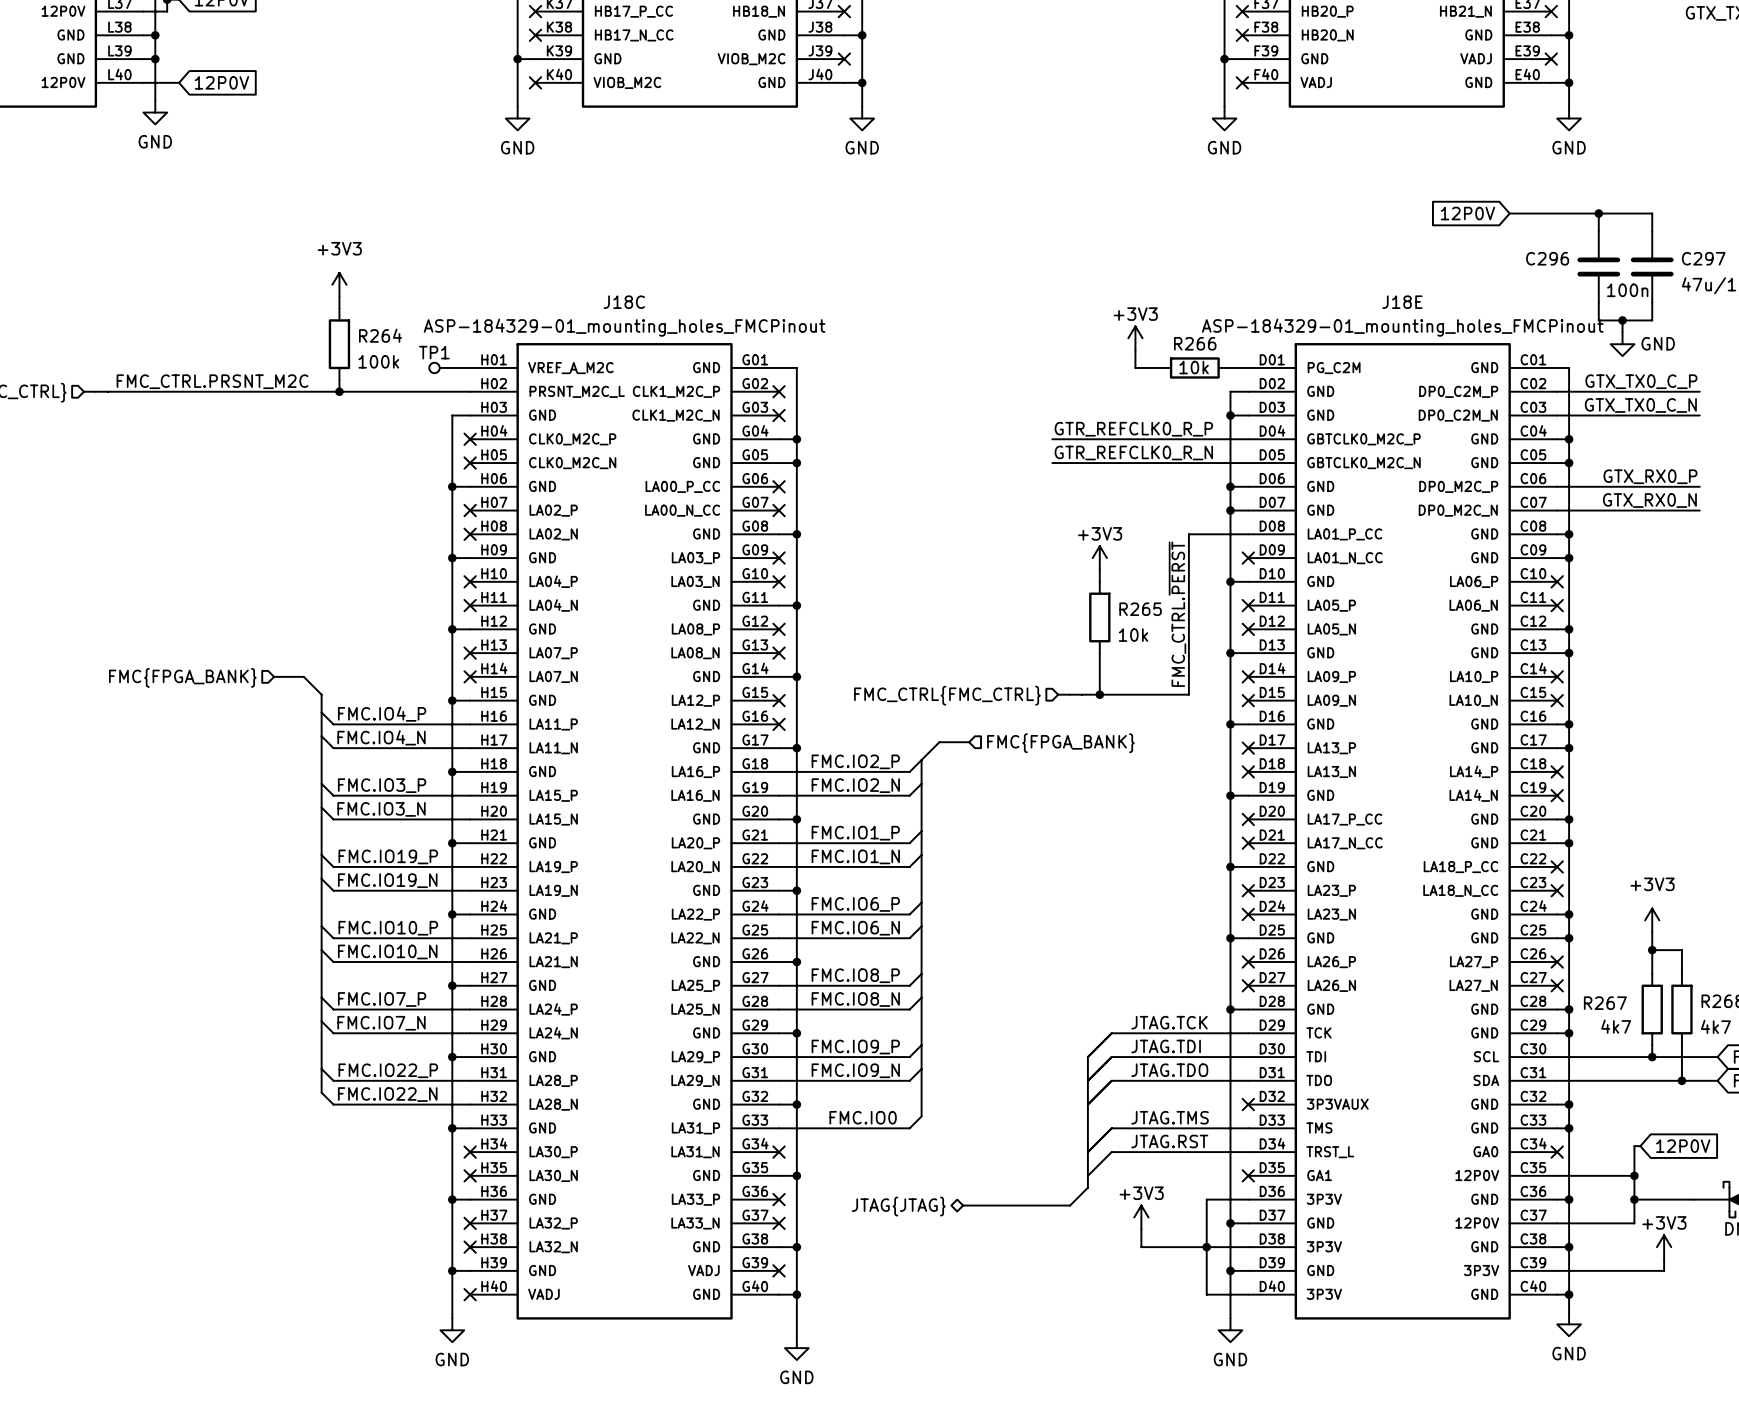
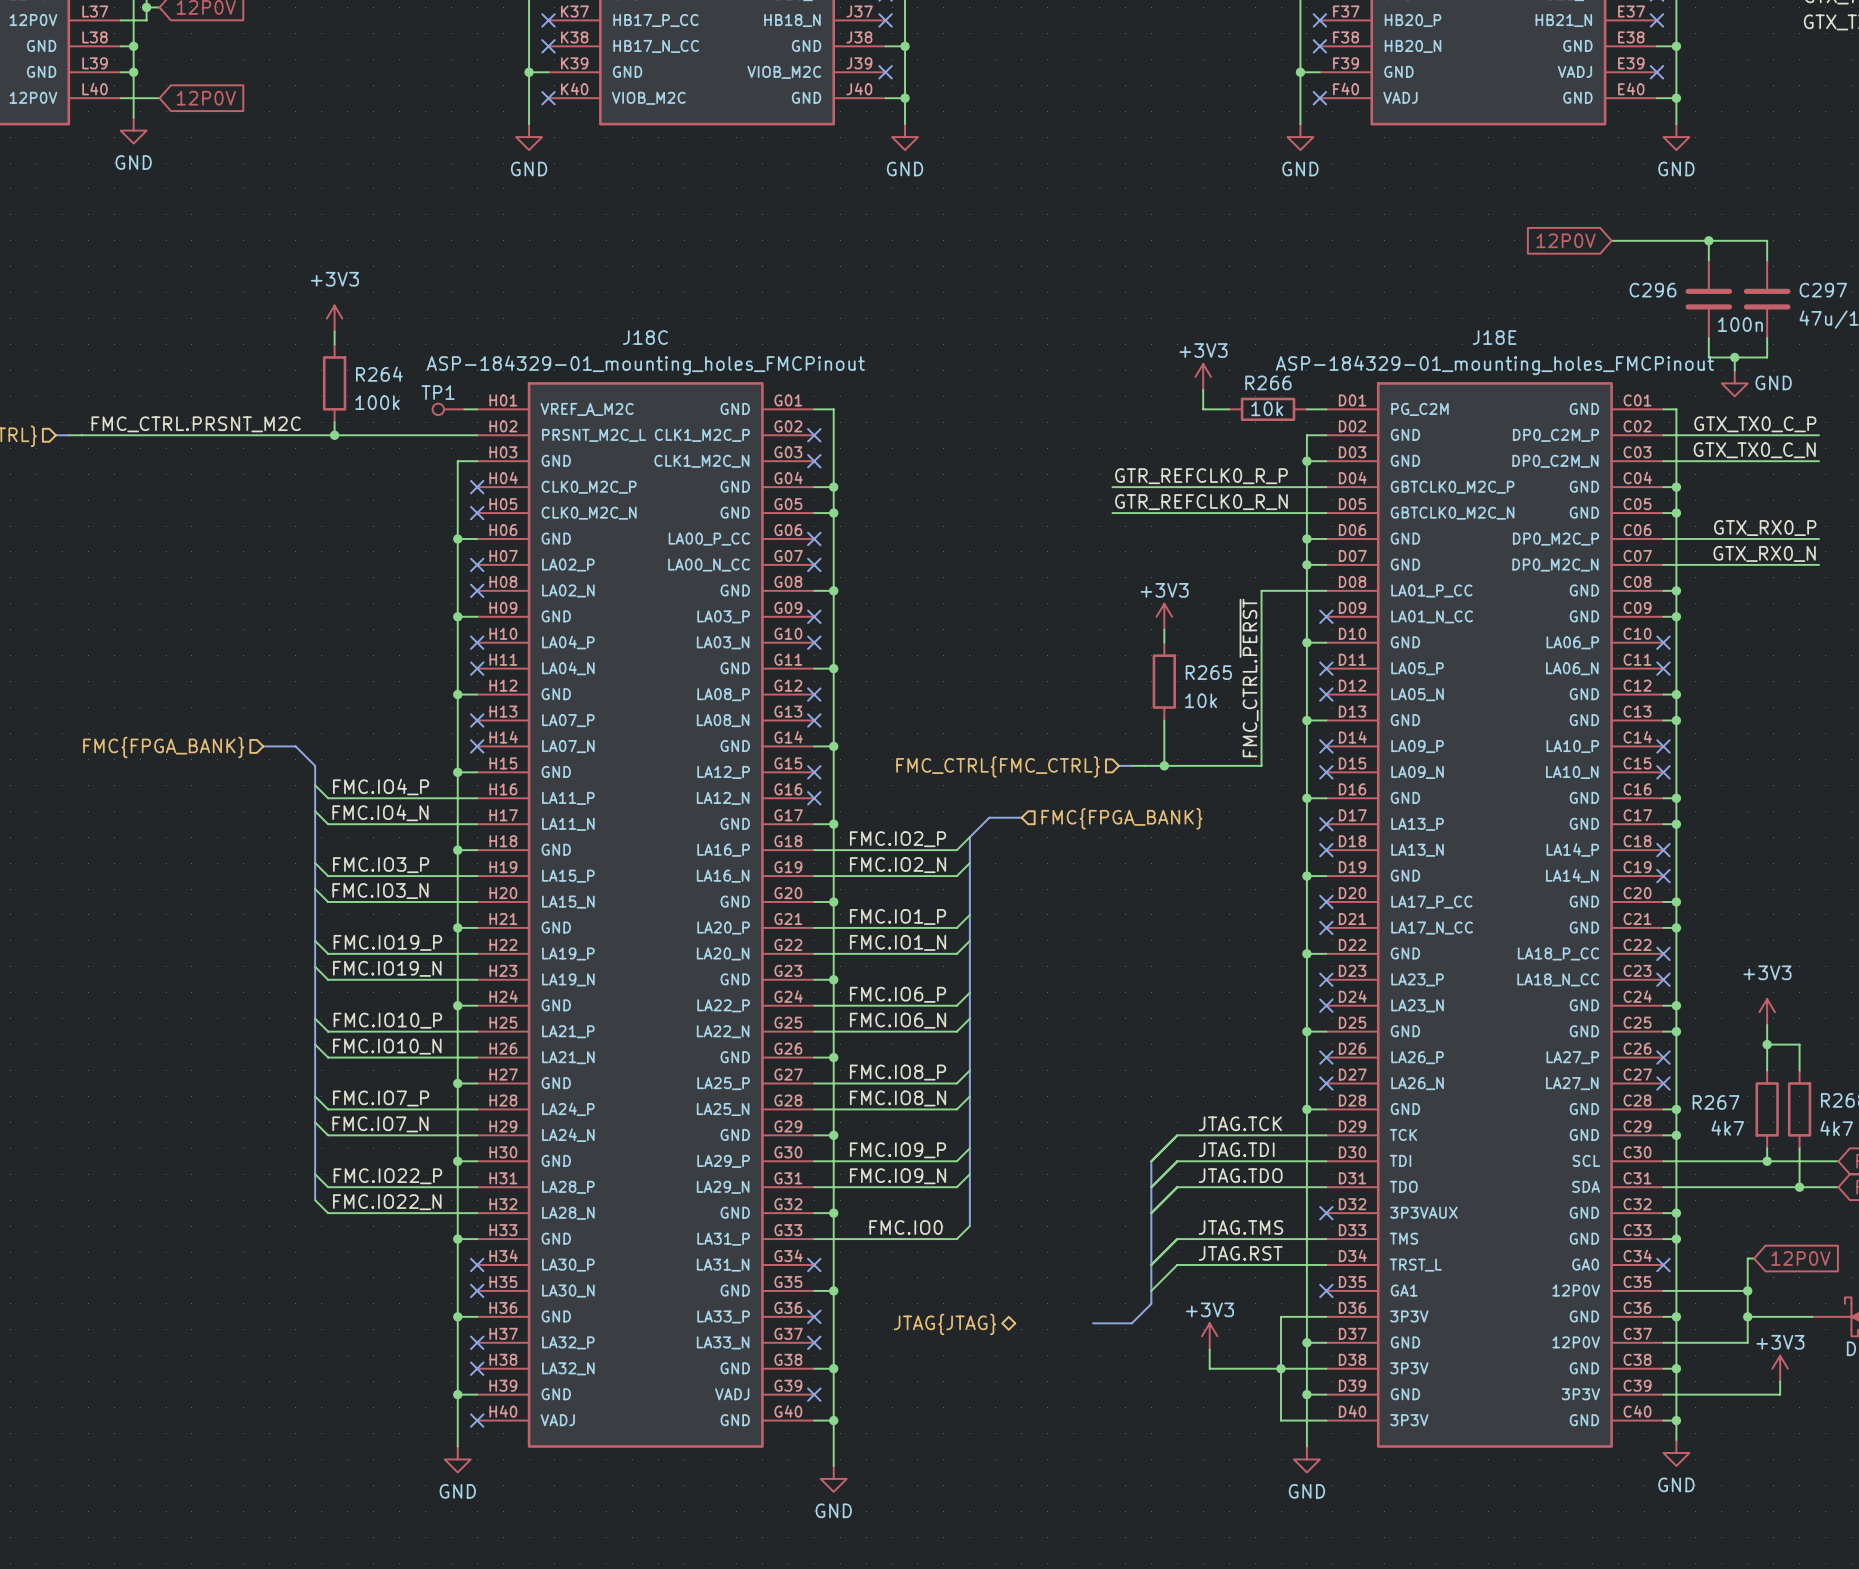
bus: (963, 1205) (1034, 1205) -> none

